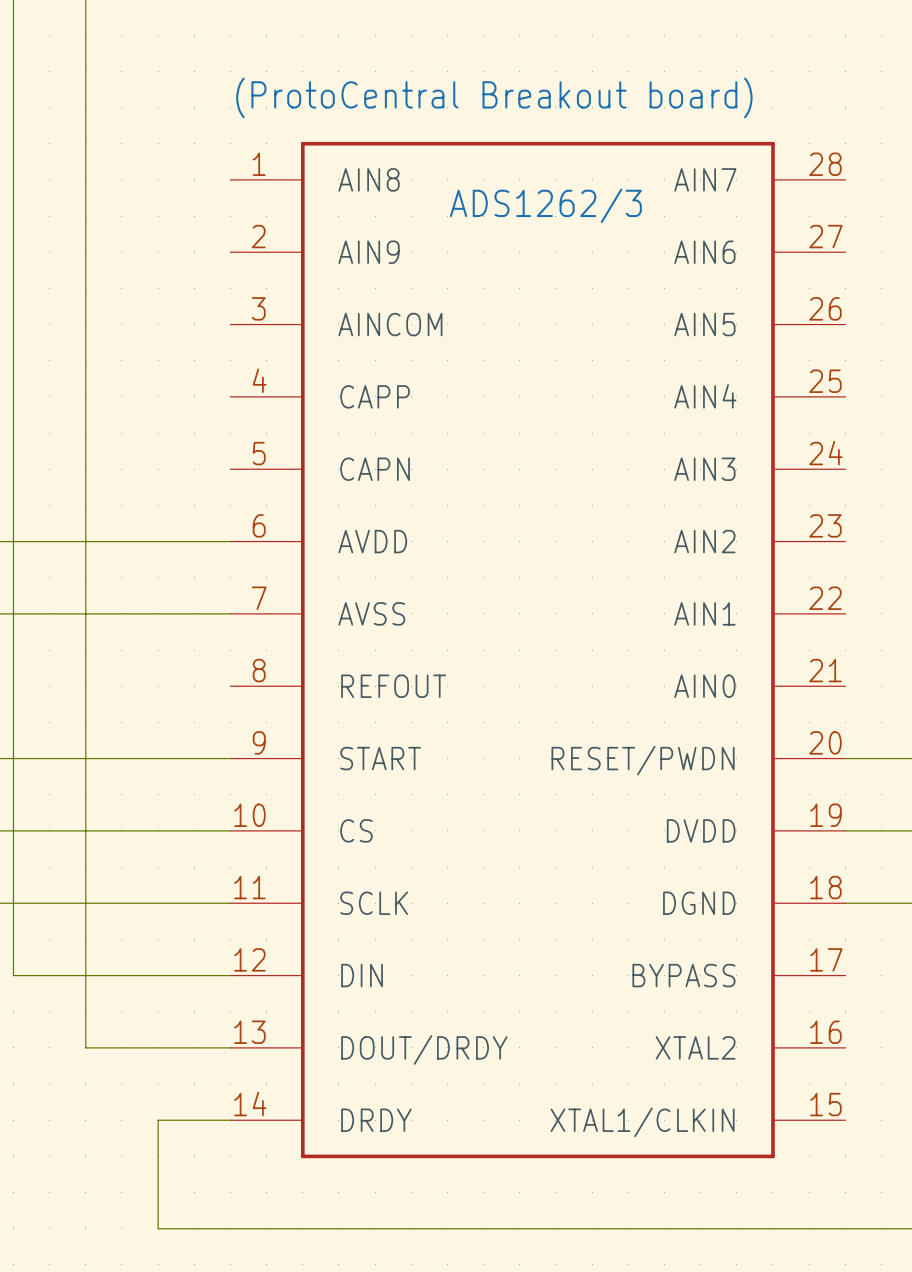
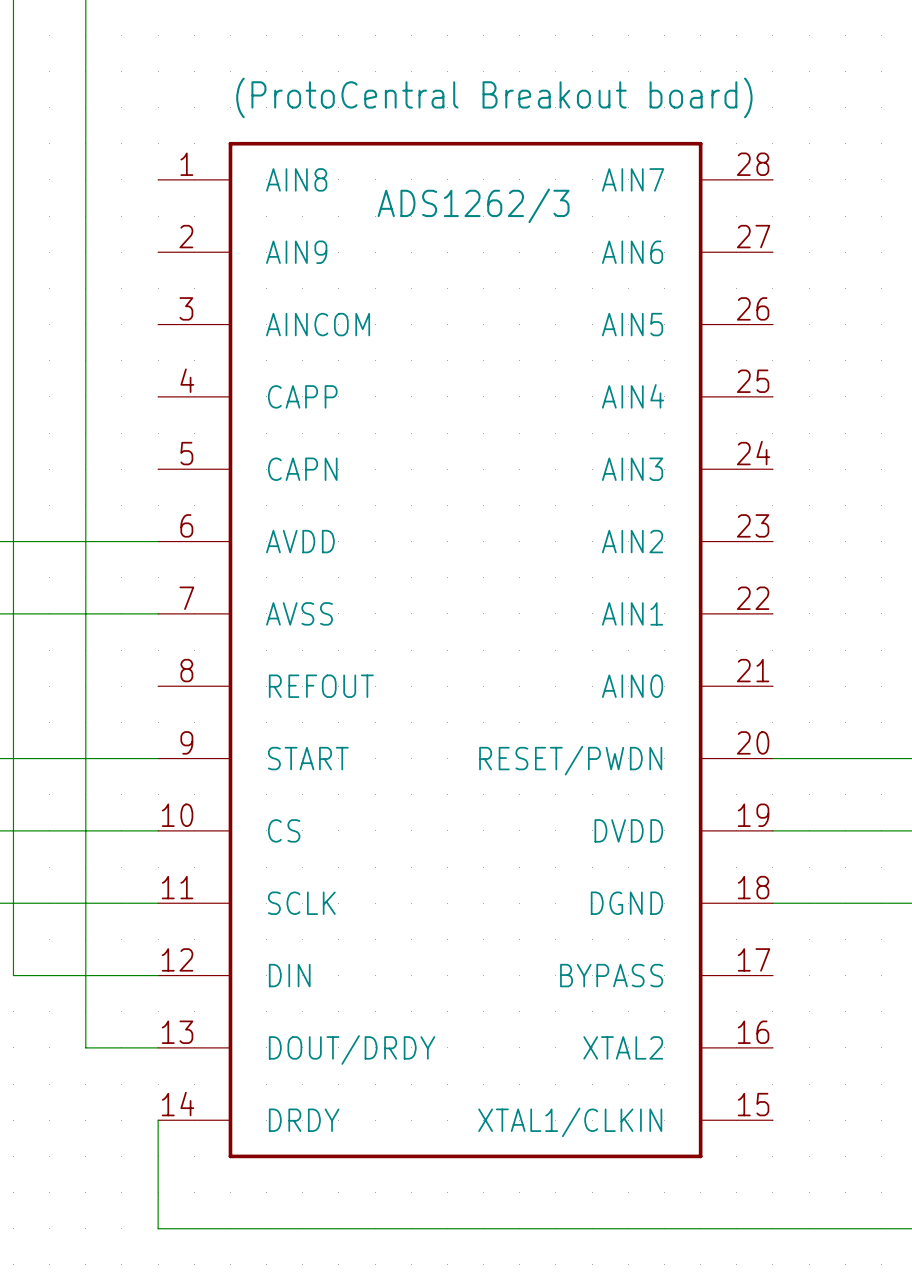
part position: (537, 650) -> (465, 650)

